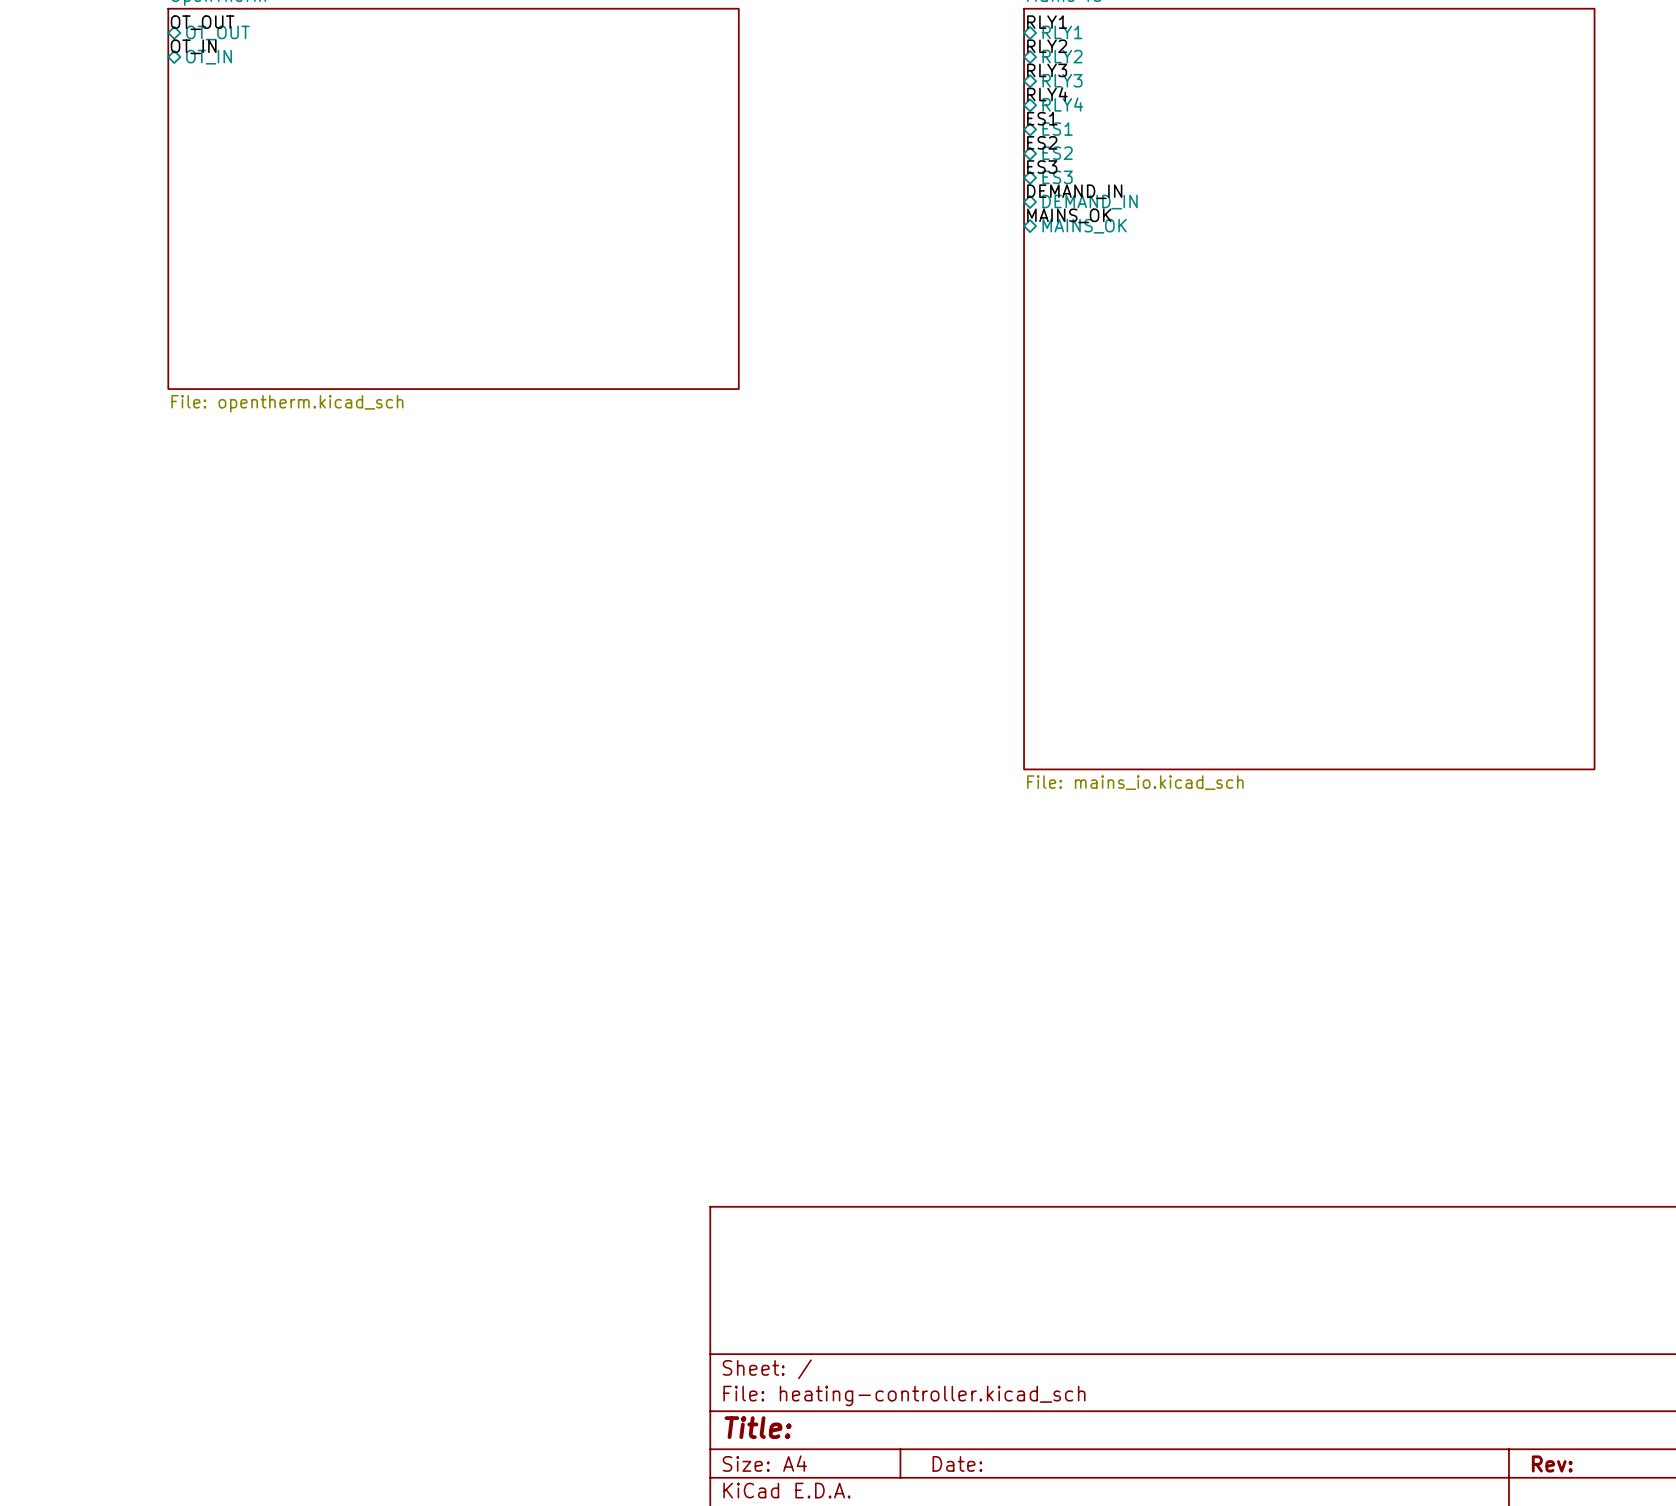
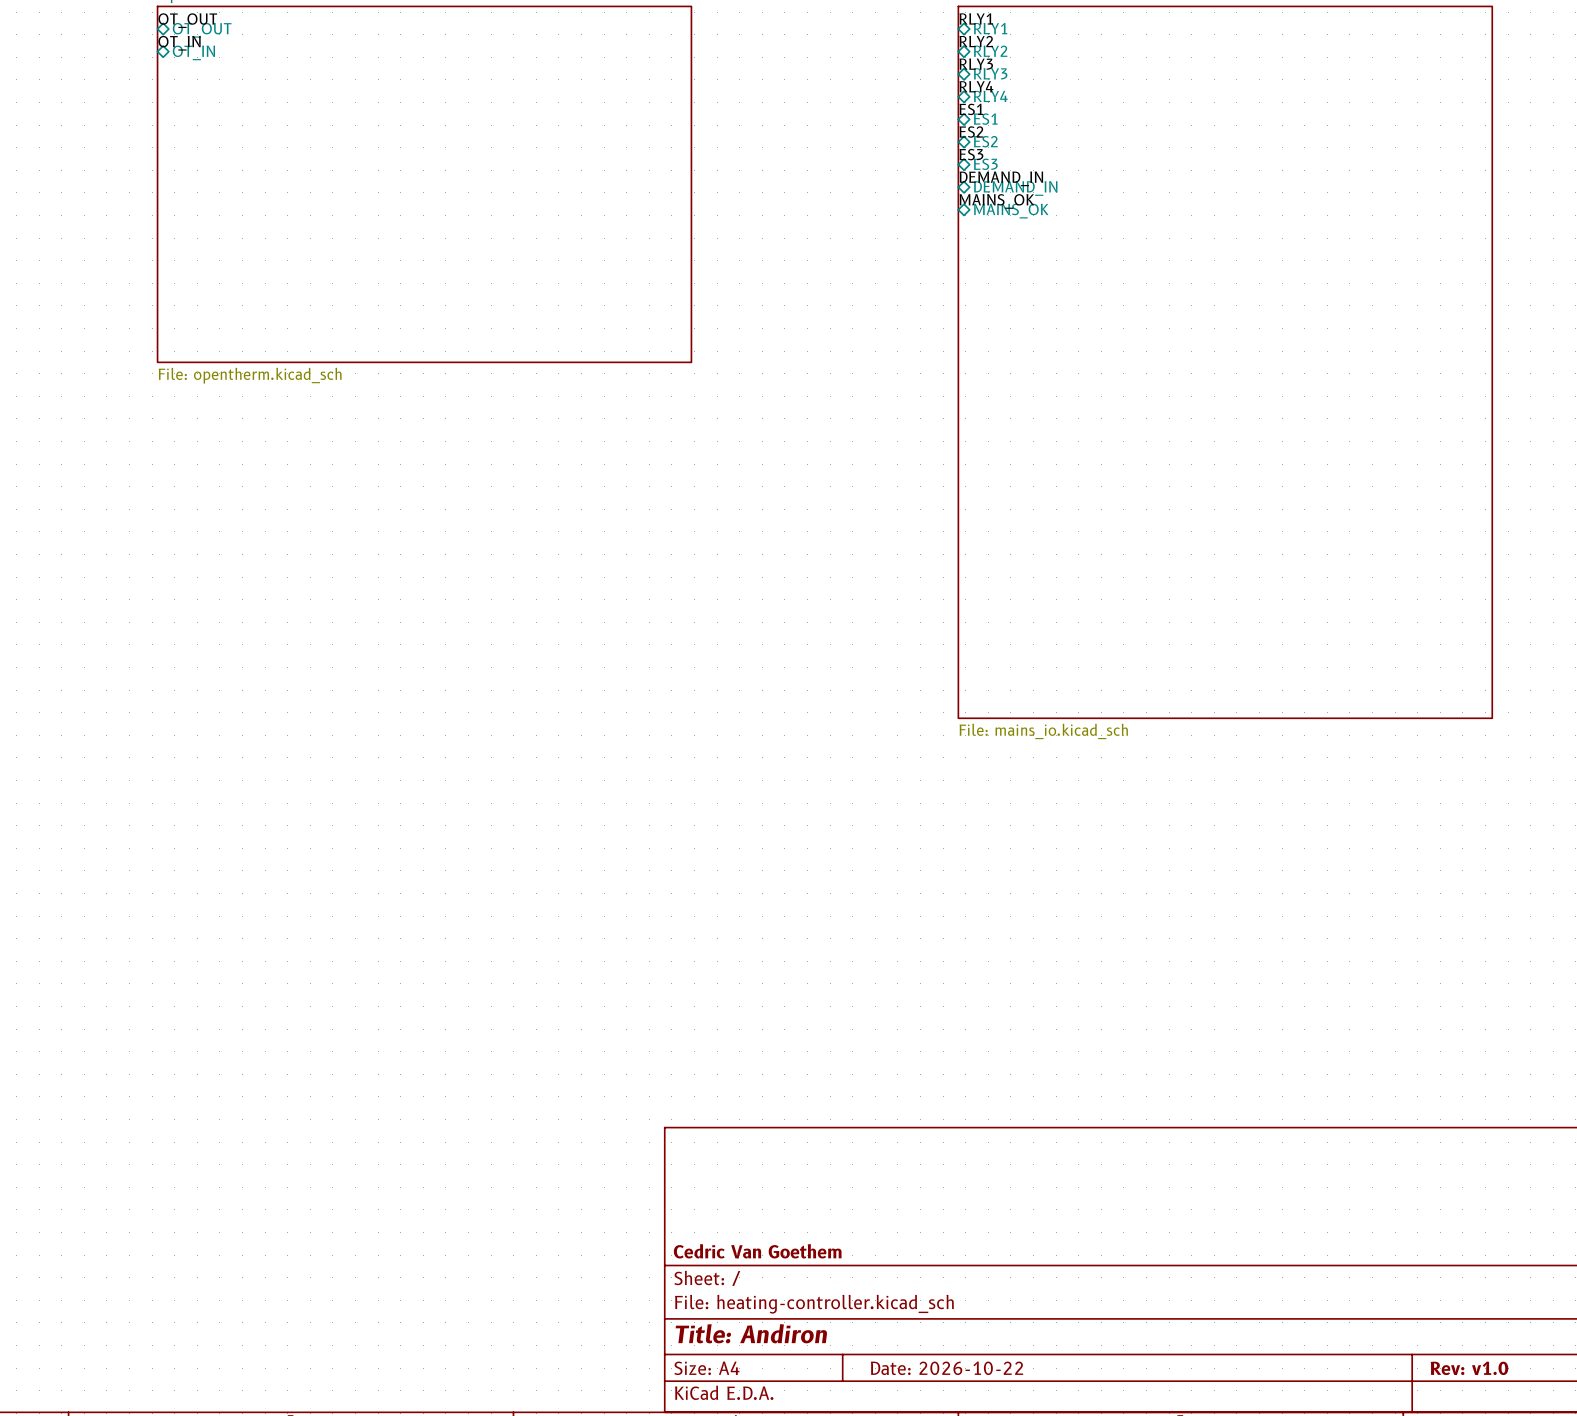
title block: none -> Cedric Van Goethem (757, 1251)
title block: Title: (758, 1427) -> Title: Andiron (751, 1333)
title block: Date: (957, 1463) -> Date: 2026-10-22 (947, 1368)
title block: Rev: (1552, 1463) -> Rev: v1.0 (1469, 1368)

